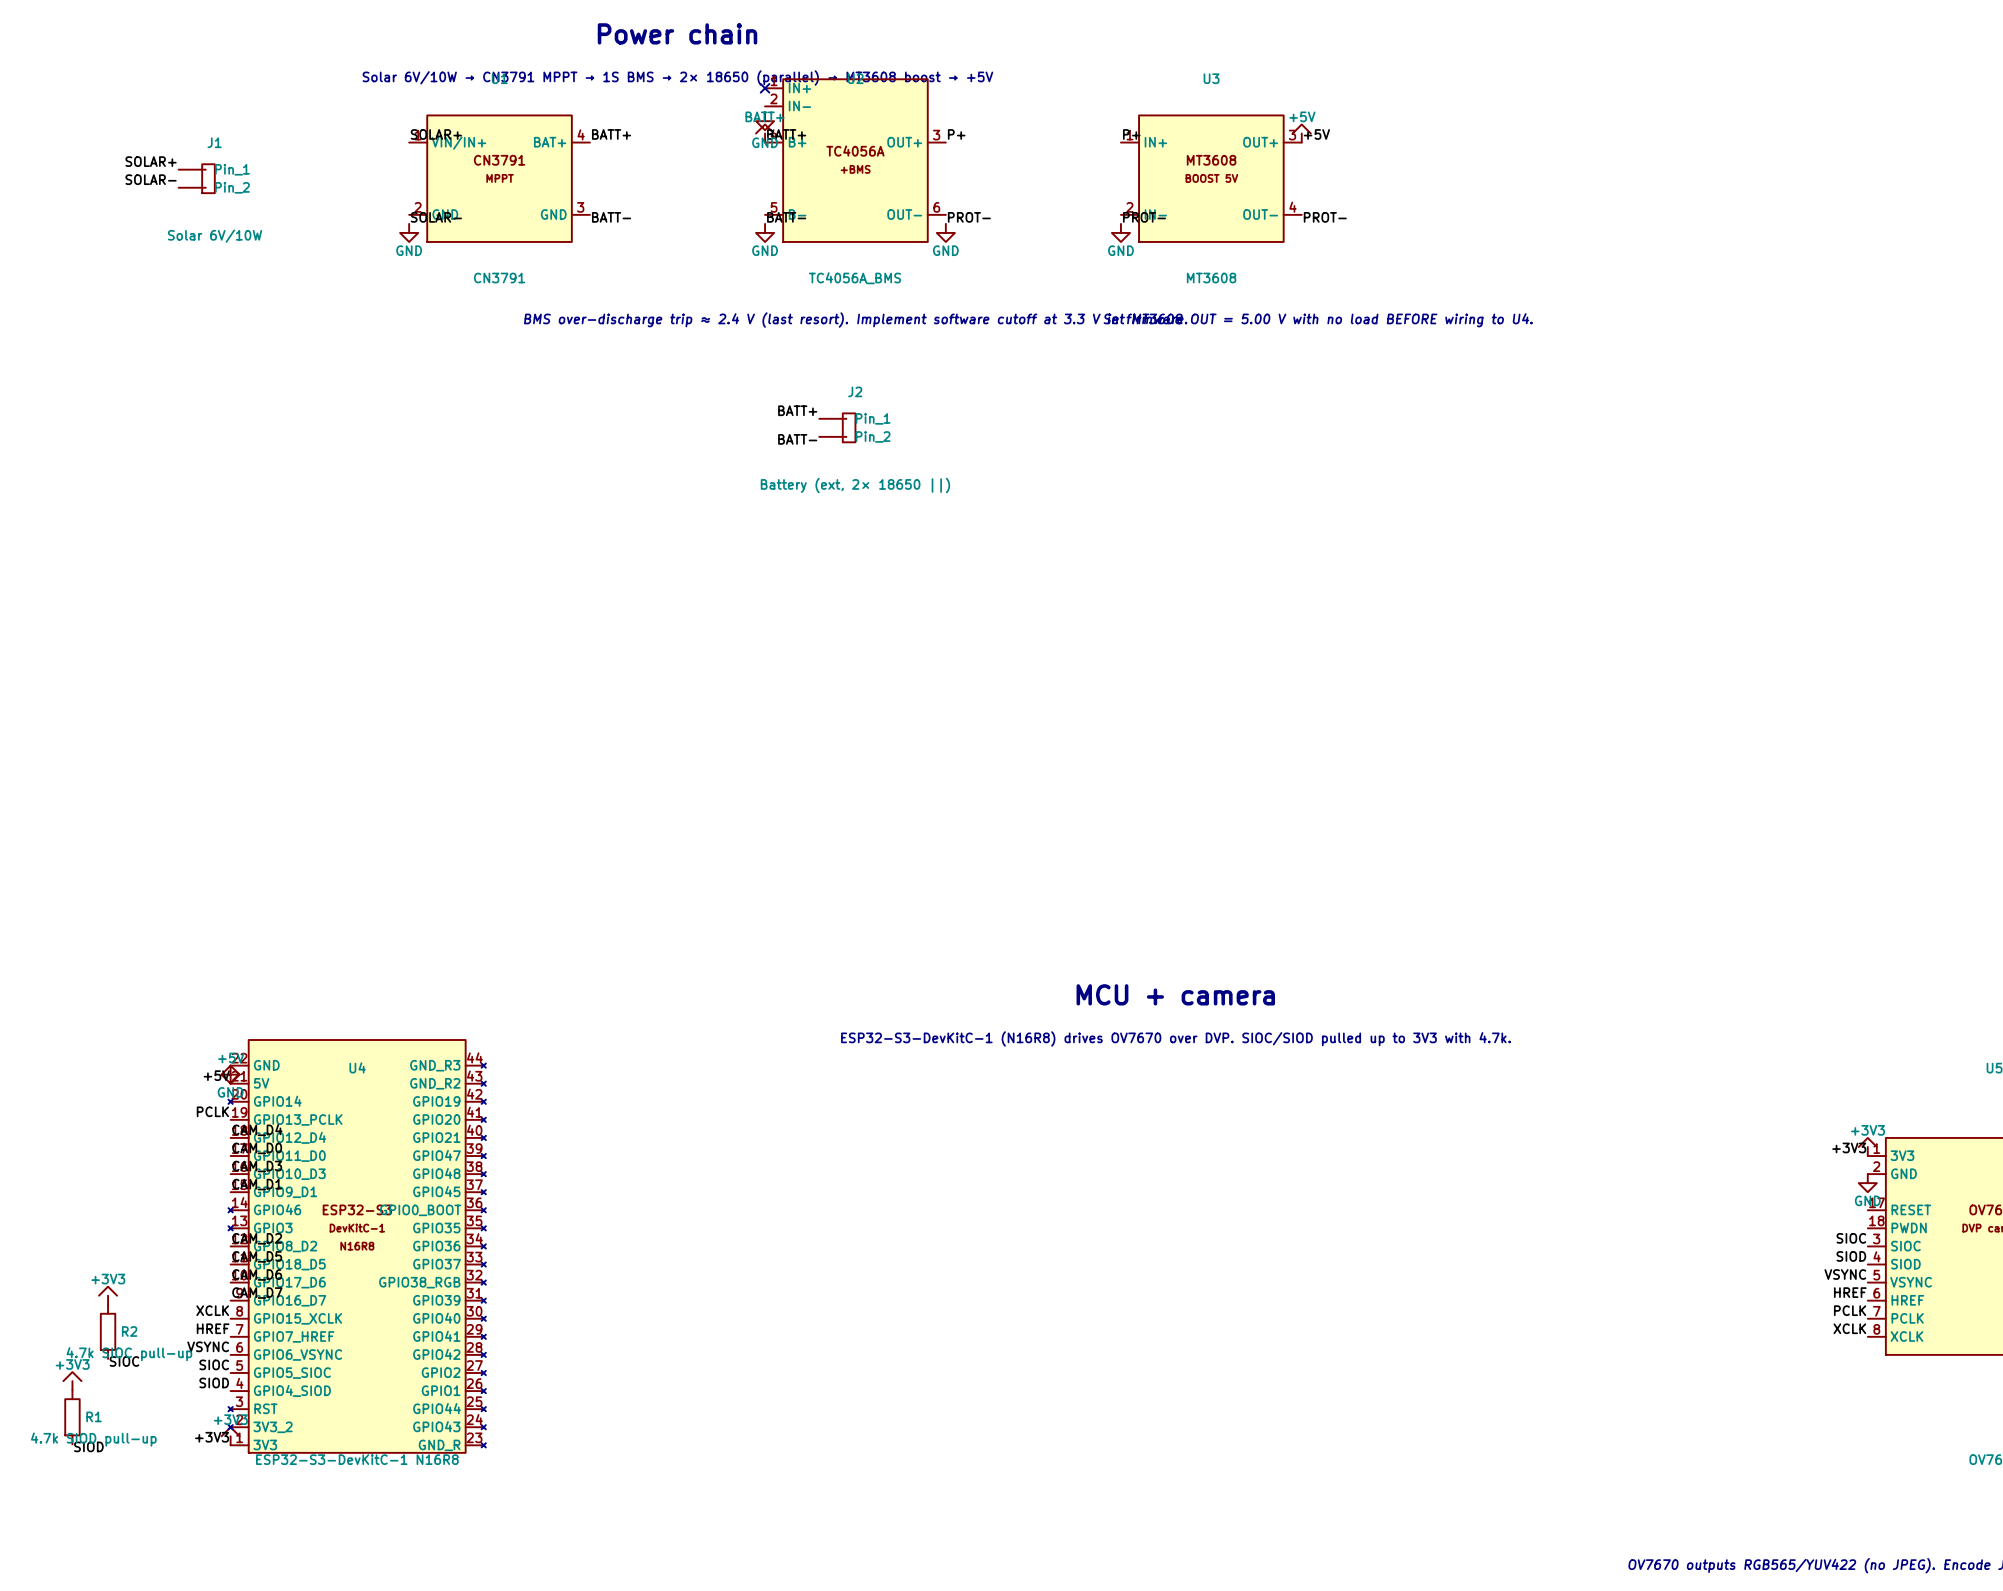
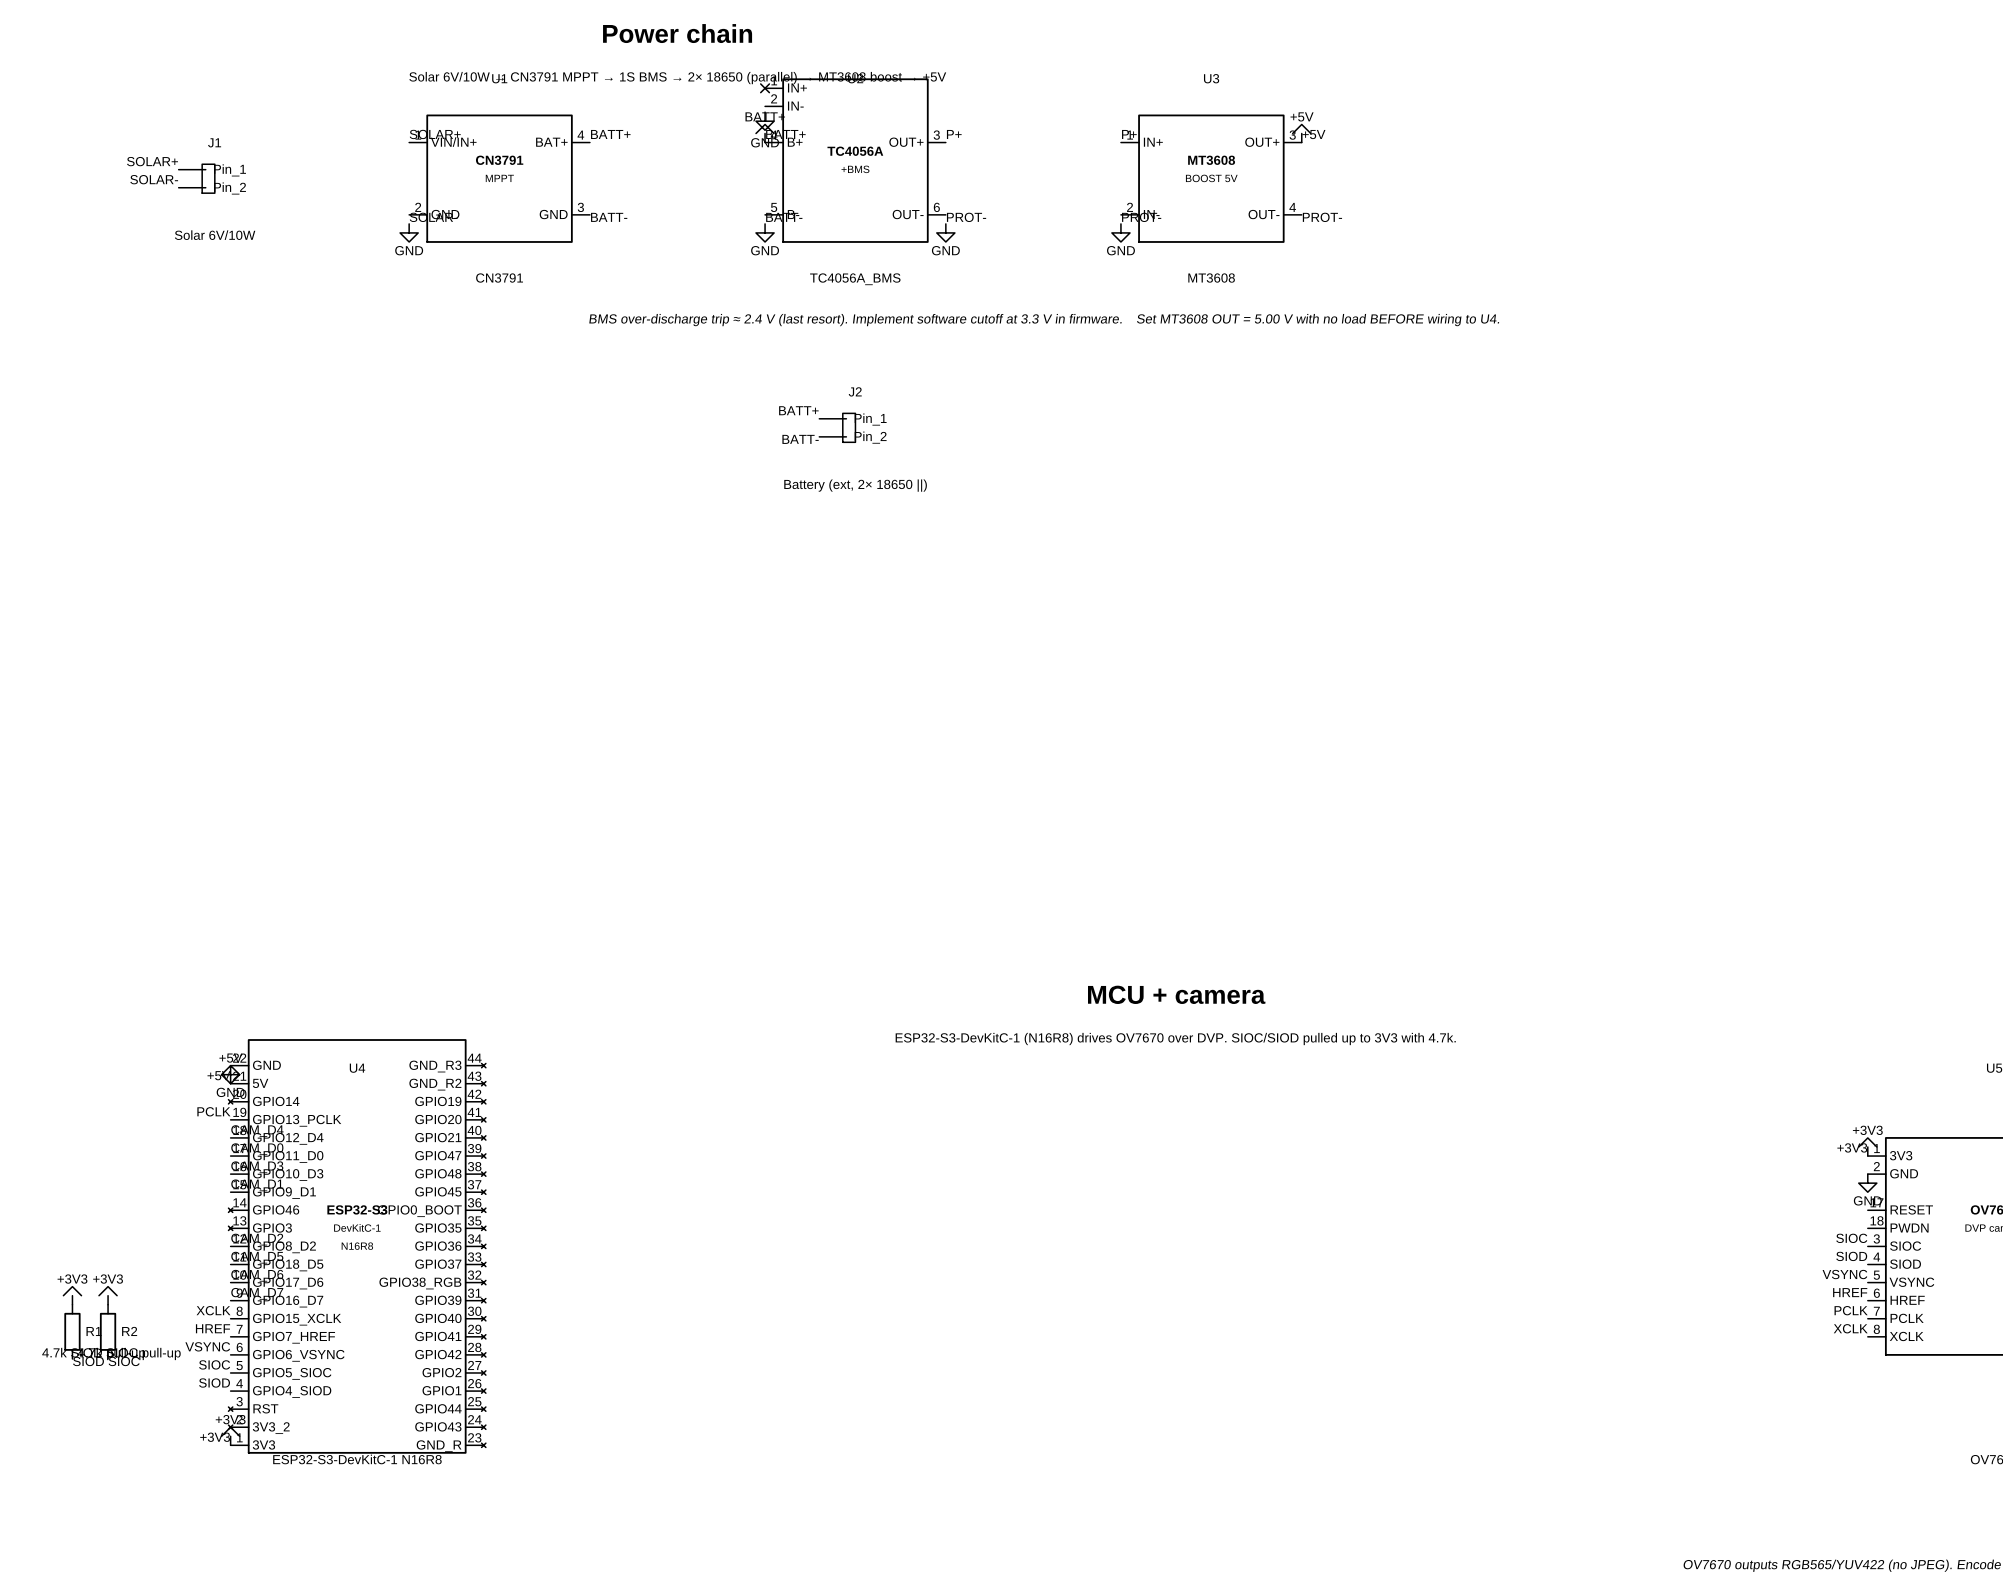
power symbol position: +3V3 (72, 1381) -> +3V3 (72, 1295)
R1 position: (72, 1417) -> (72, 1331)
label position: SIOD (88, 1446) -> SIOD (88, 1361)

